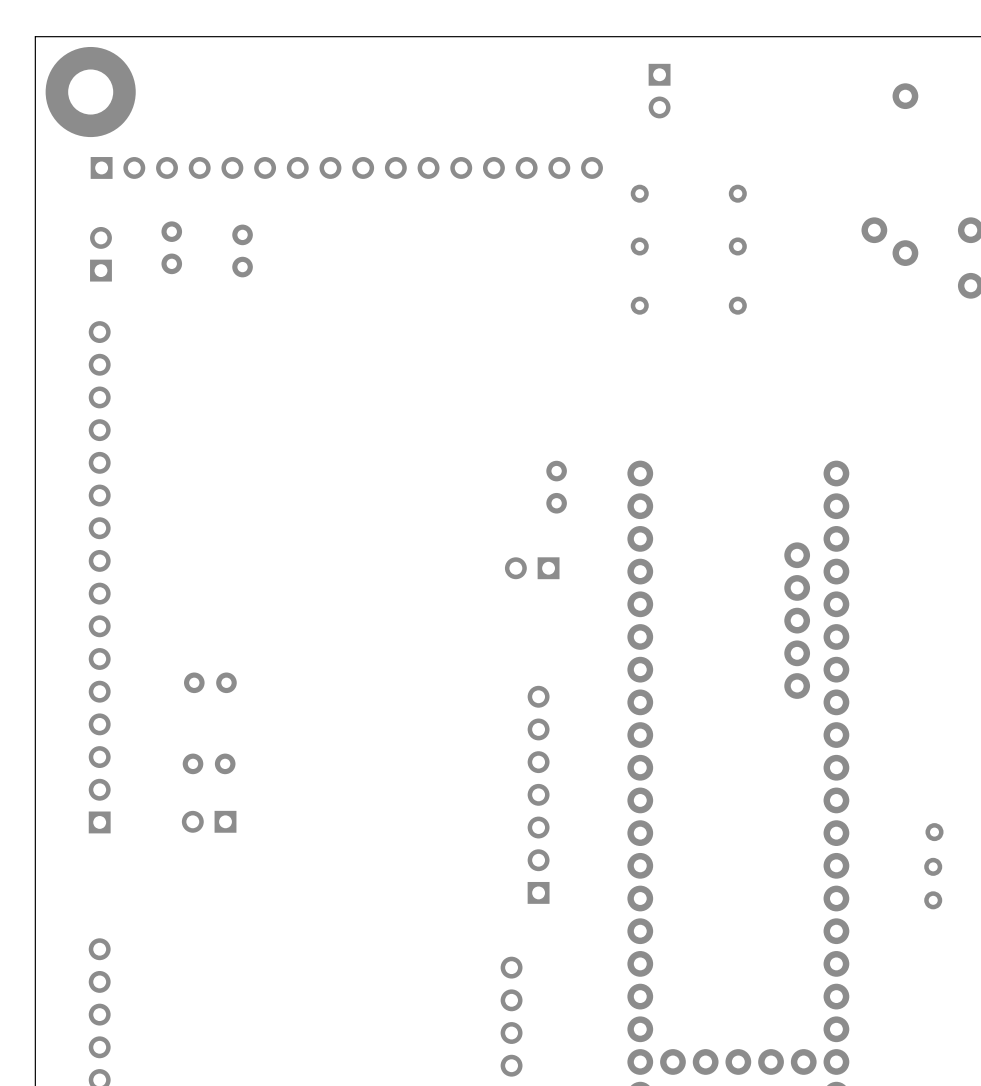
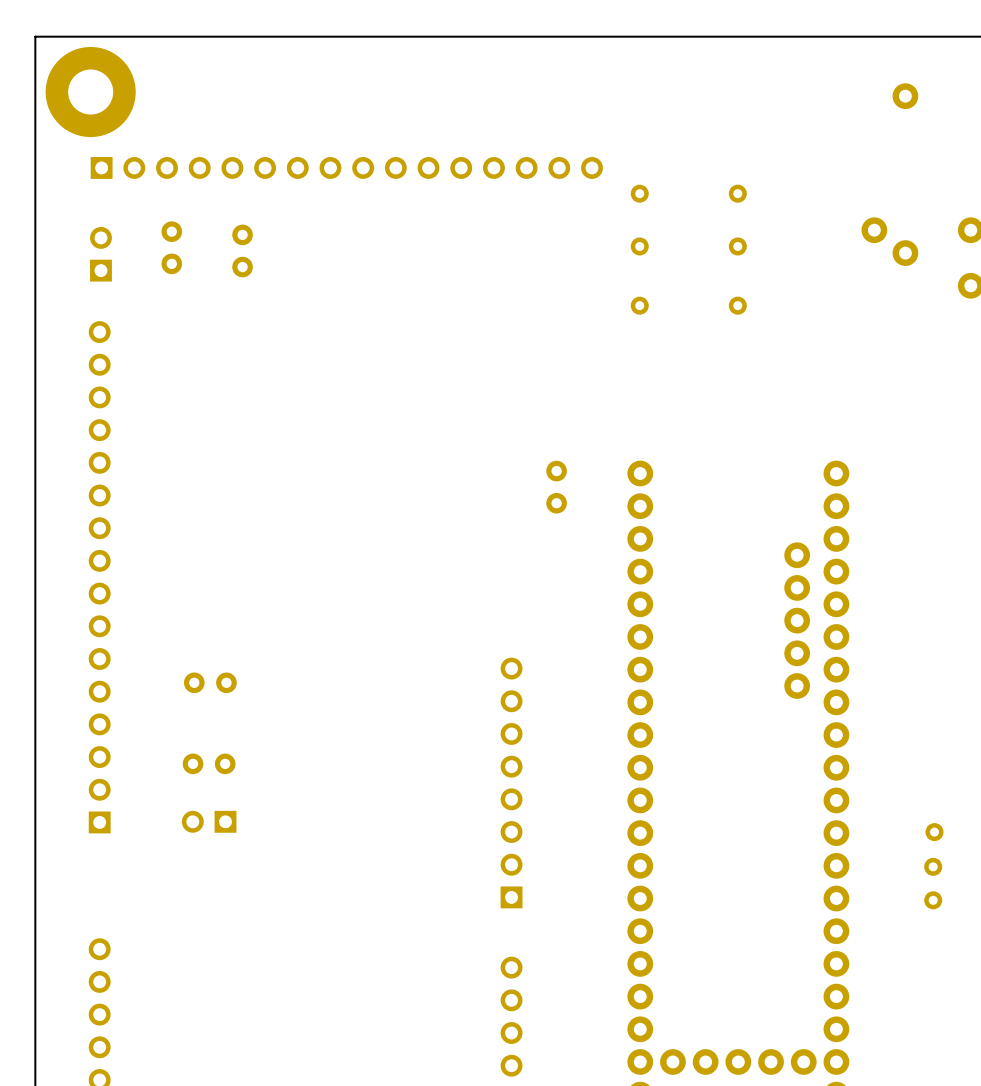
part: (659, 91) -> none
part: (532, 568) -> none
part: none -> (511, 782)
part: (538, 794) -> none

